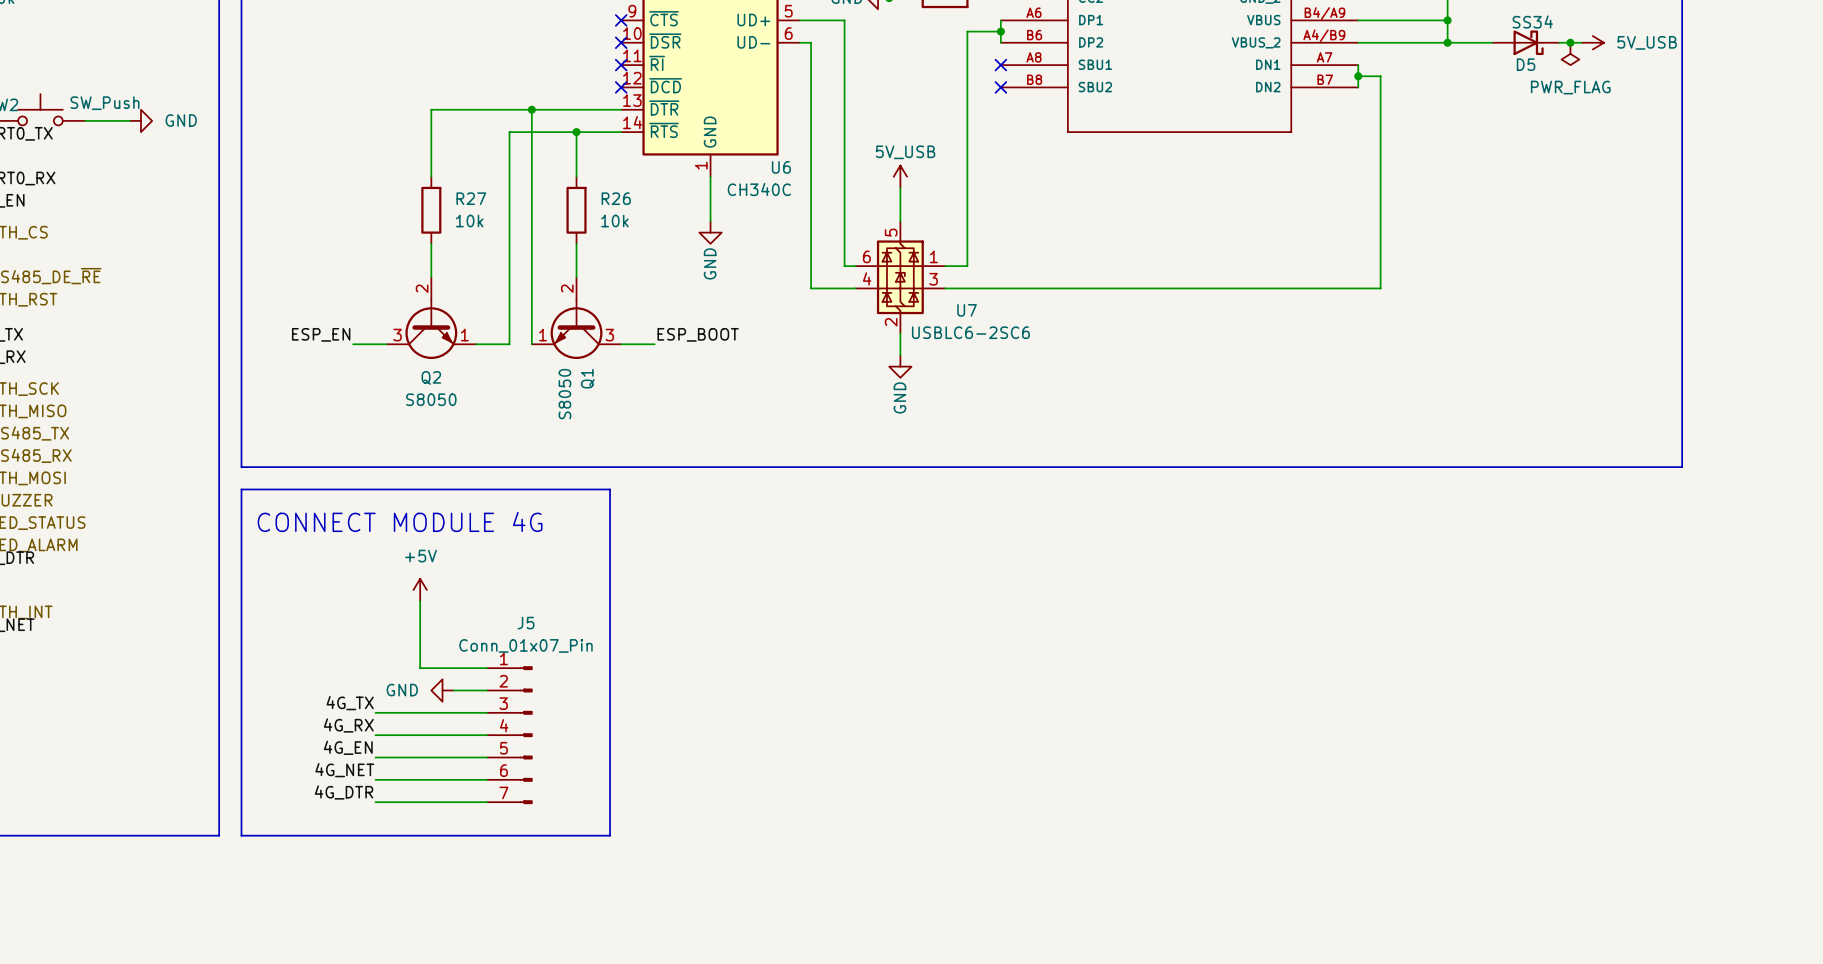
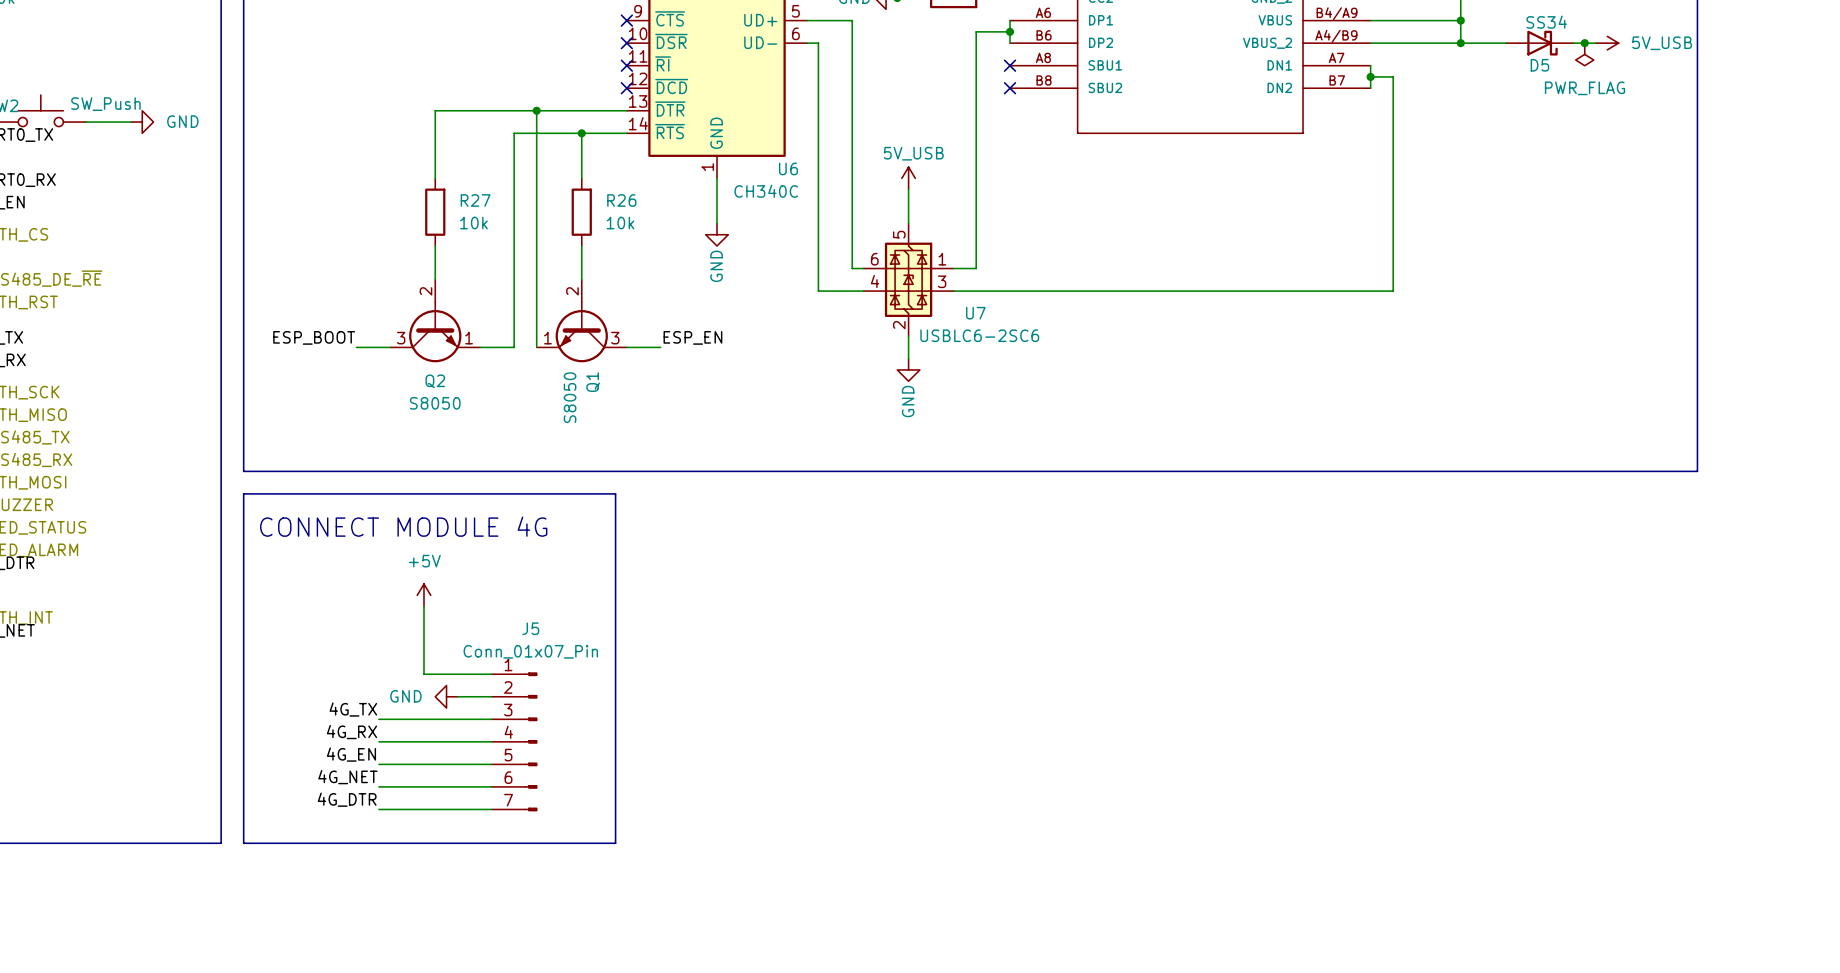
label: ESP_EN (321, 334) -> ESP_BOOT (314, 337)
label: ESP_BOOT (698, 334) -> ESP_EN (692, 337)

